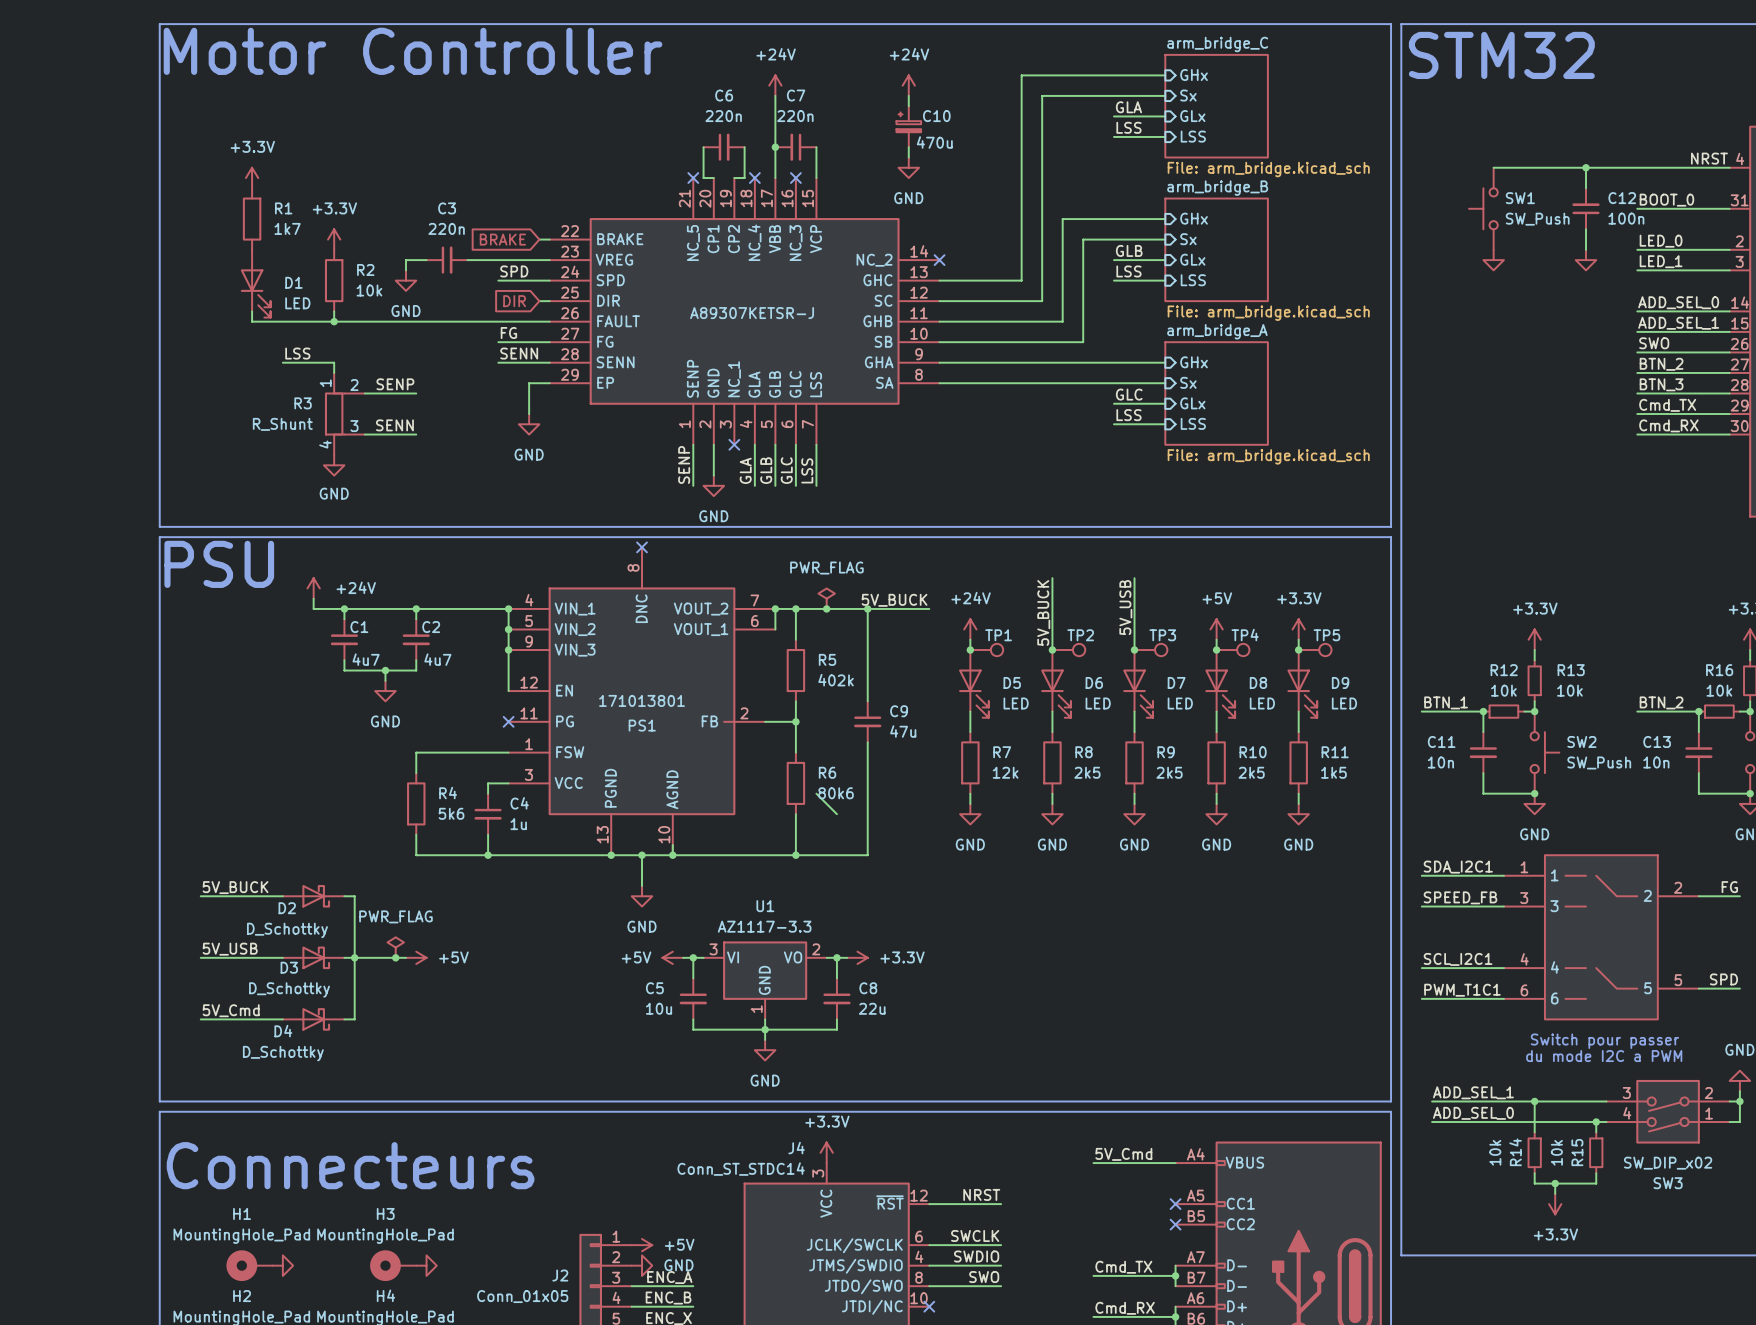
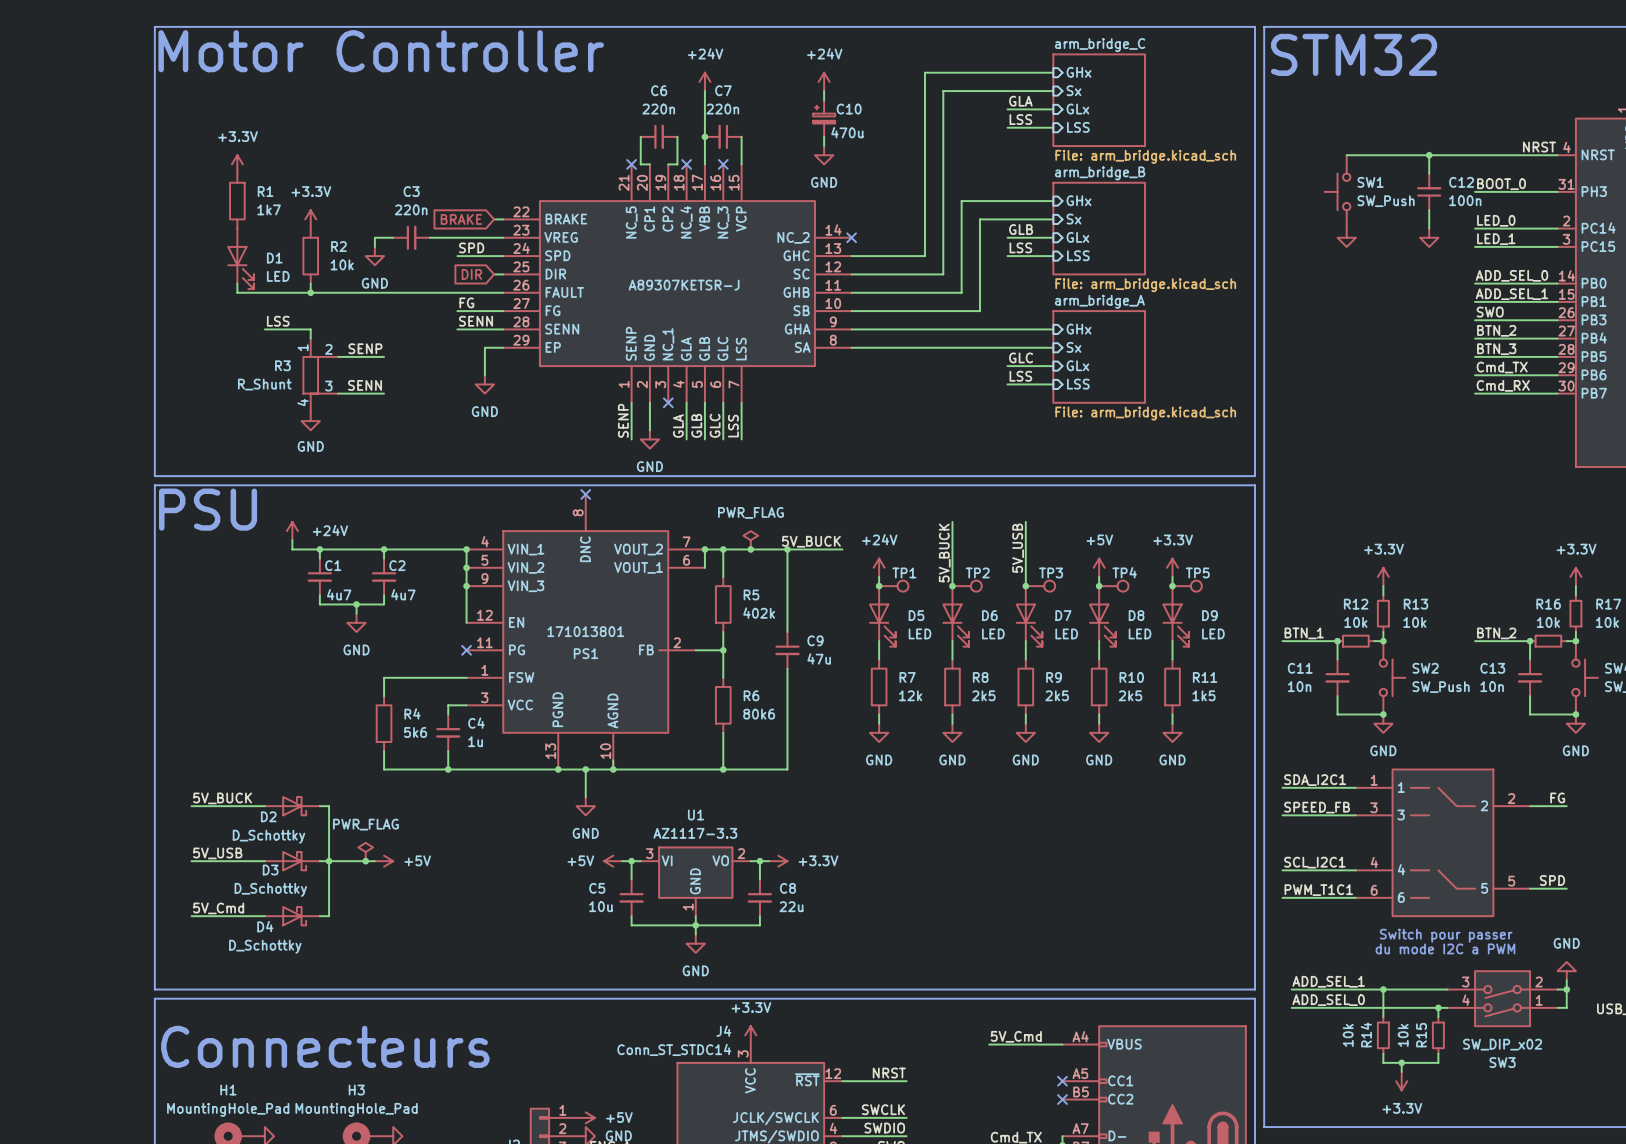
wire: (816, 793) (836, 814) -> none

